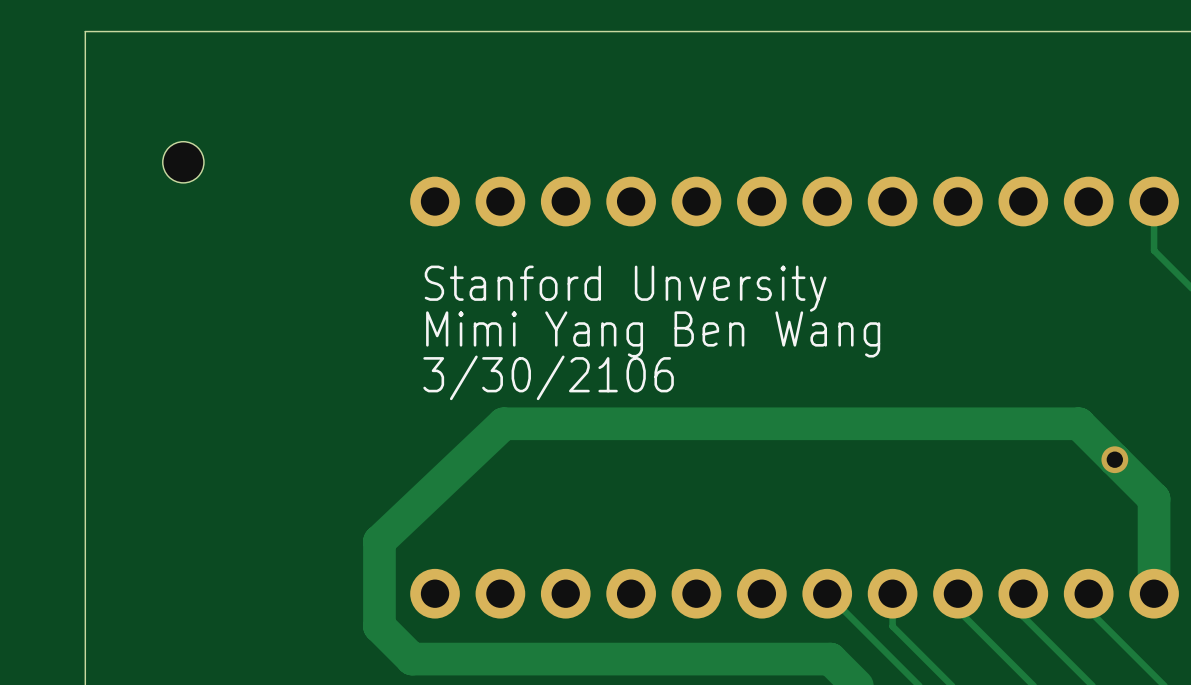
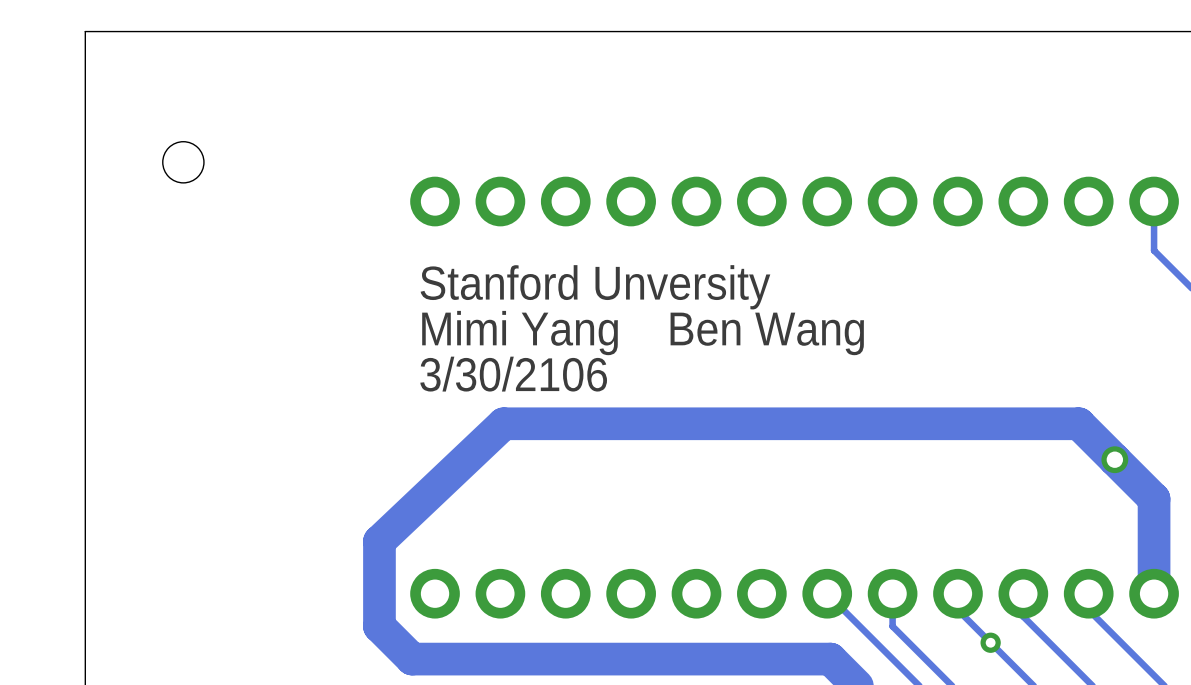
via: none -> (990, 642)

